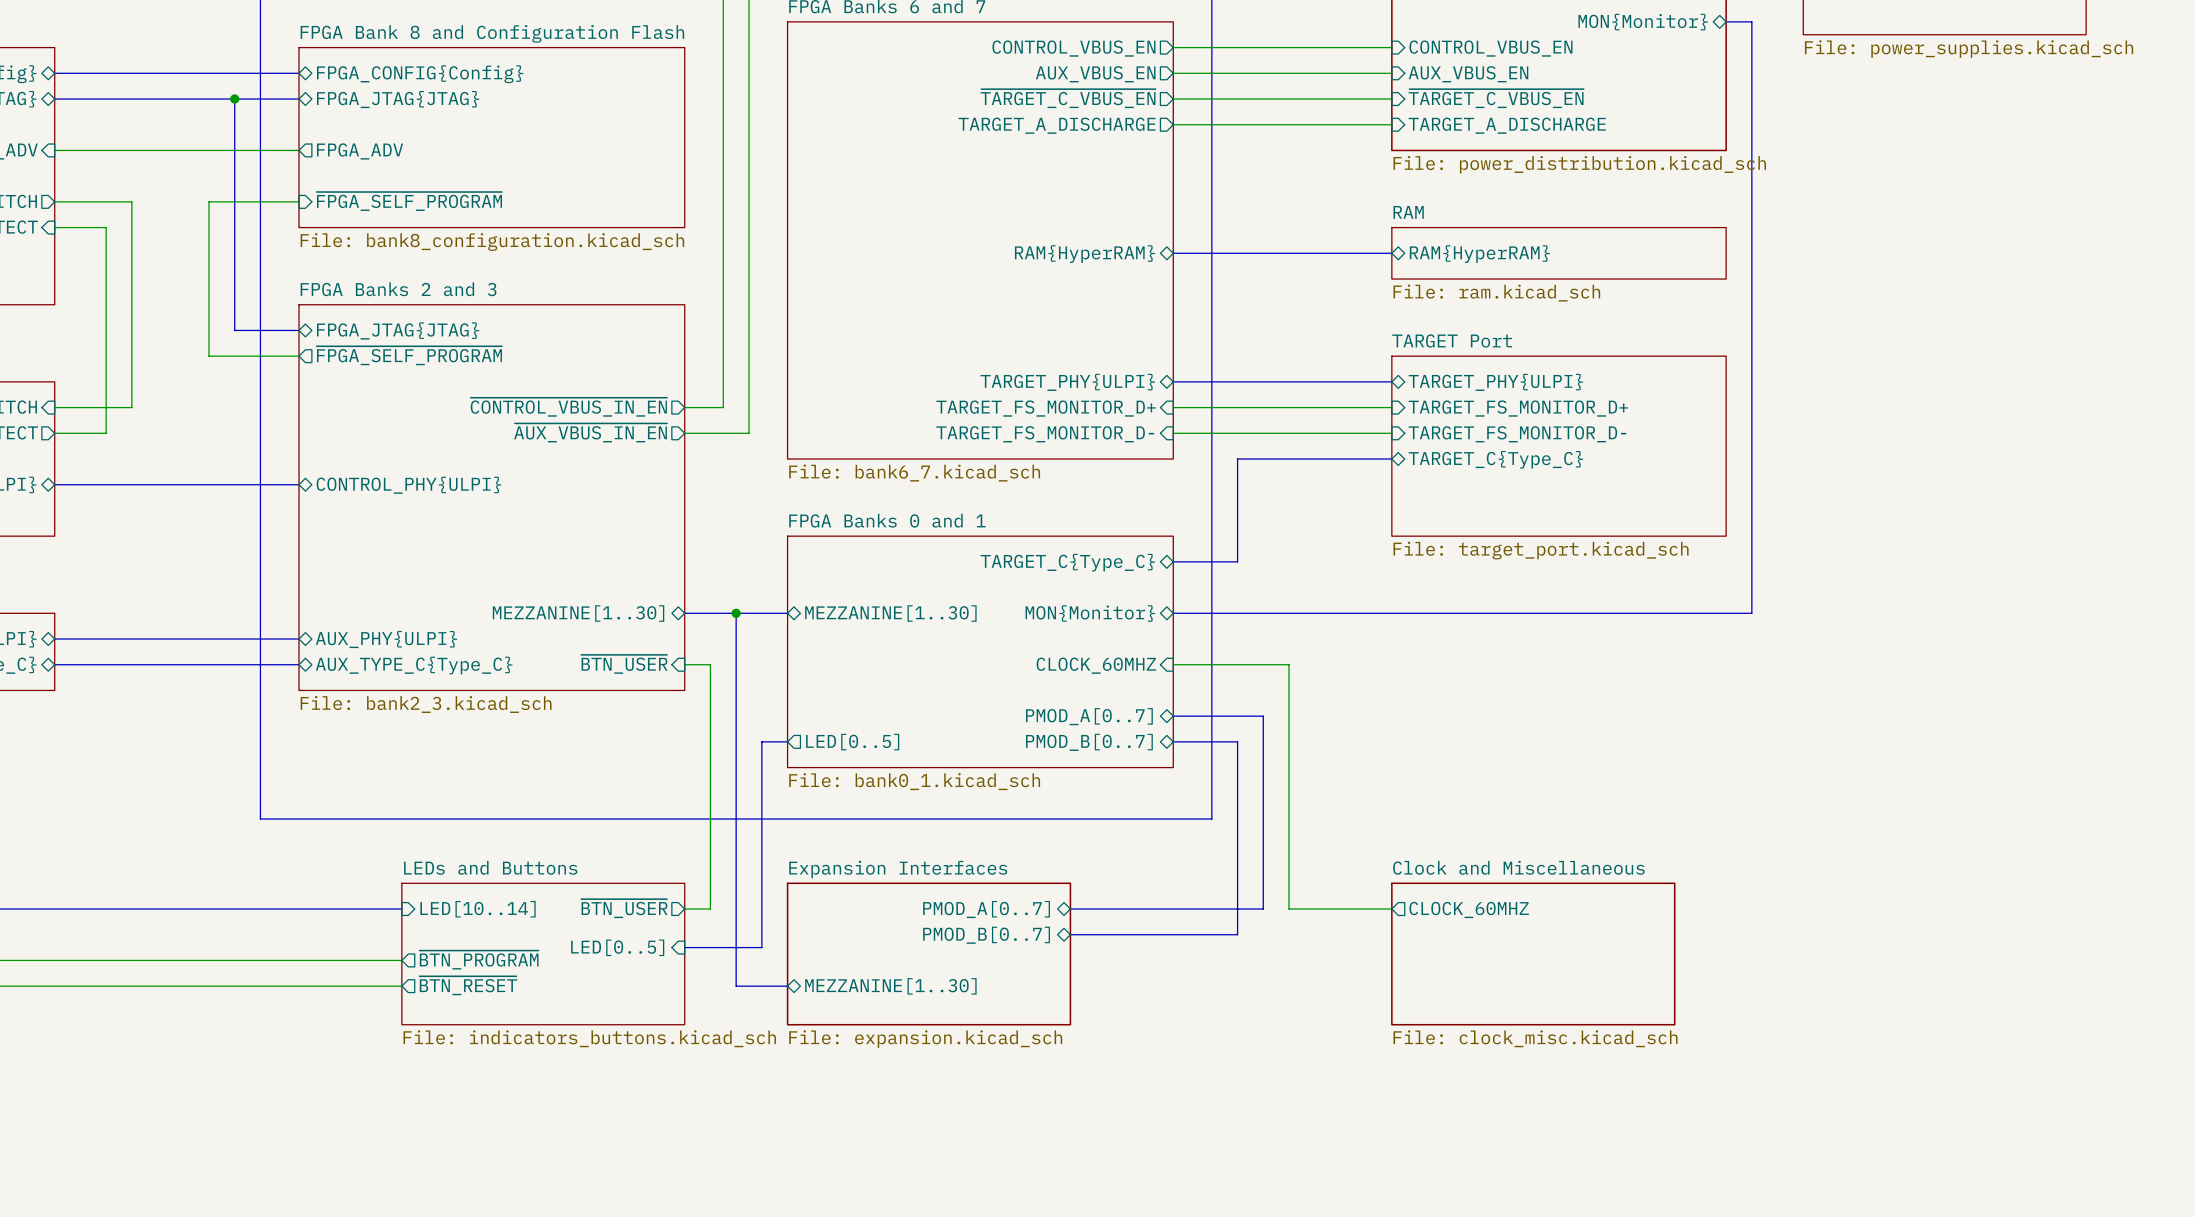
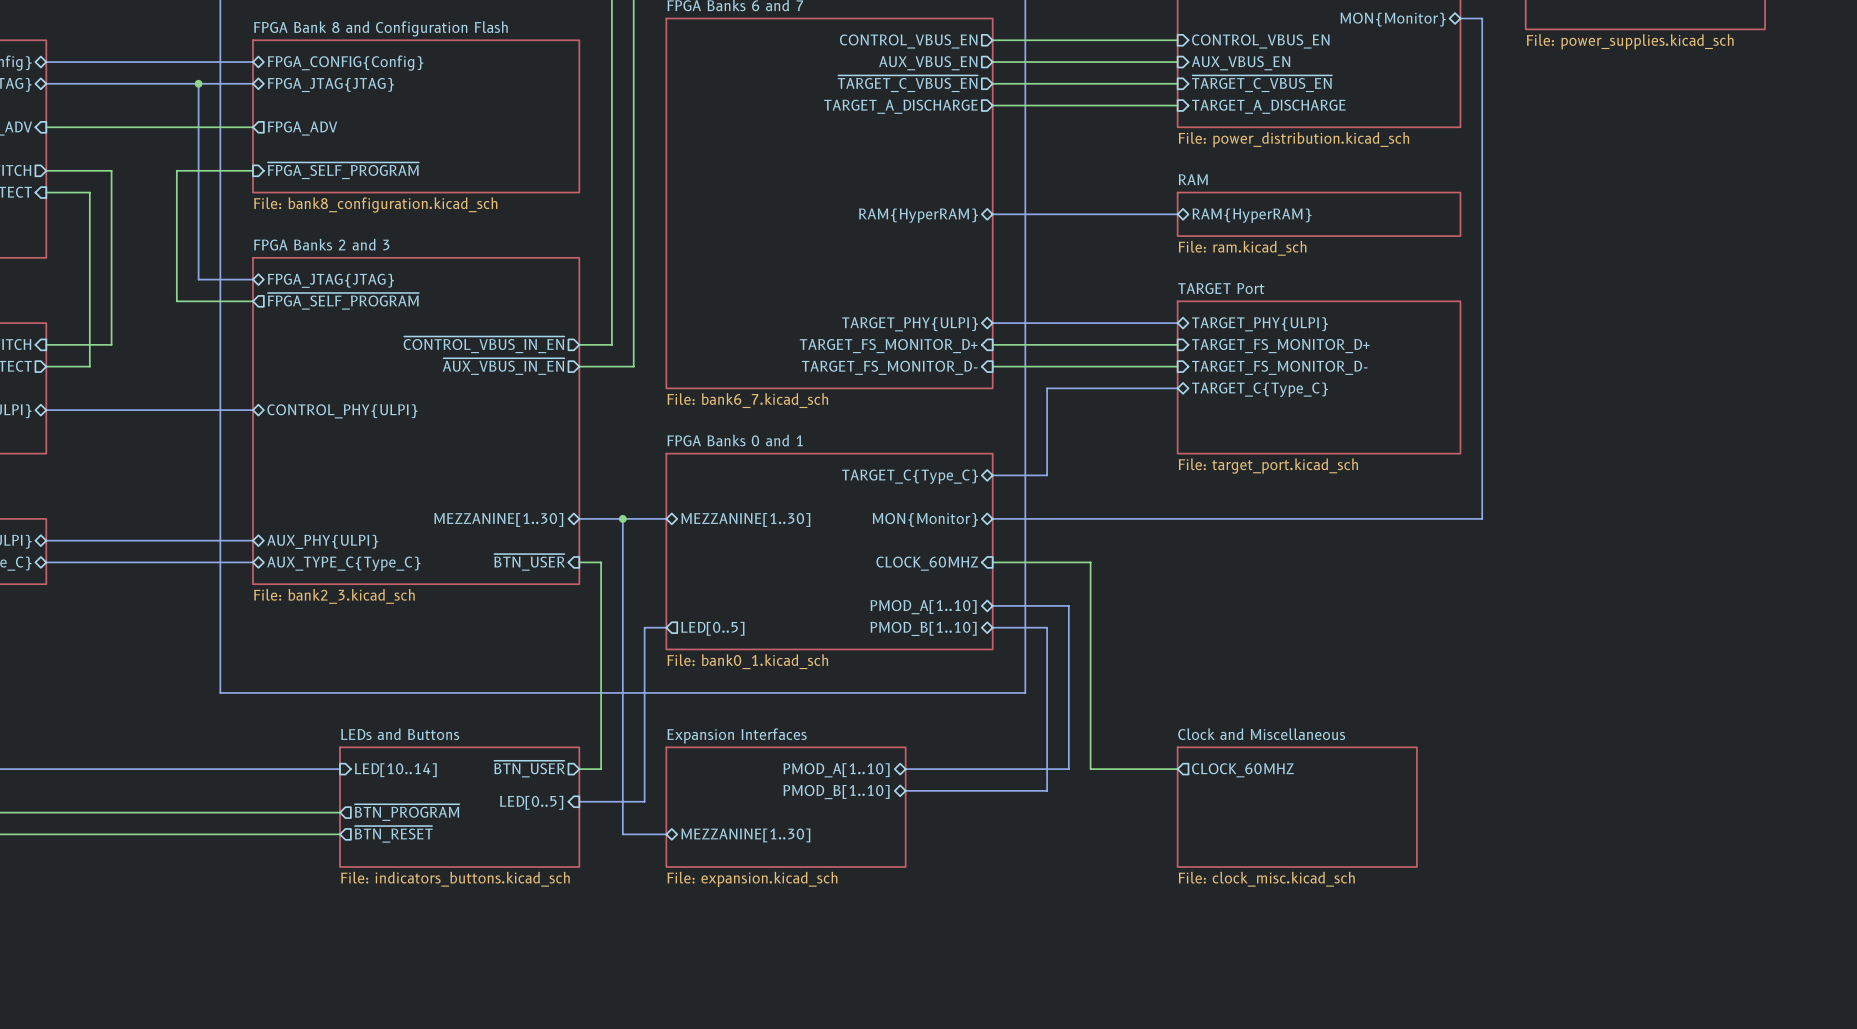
sheet pin: PMOD_A[0..7] (1089, 716) -> PMOD_A[1..10] (923, 607)
sheet pin: PMOD_B[0..7] (1089, 742) -> PMOD_B[1..10] (923, 628)
sheet pin: PMOD_A[0..7] (986, 909) -> PMOD_A[1..10] (836, 770)
sheet pin: PMOD_B[0..7] (986, 935) -> PMOD_B[1..10] (836, 792)

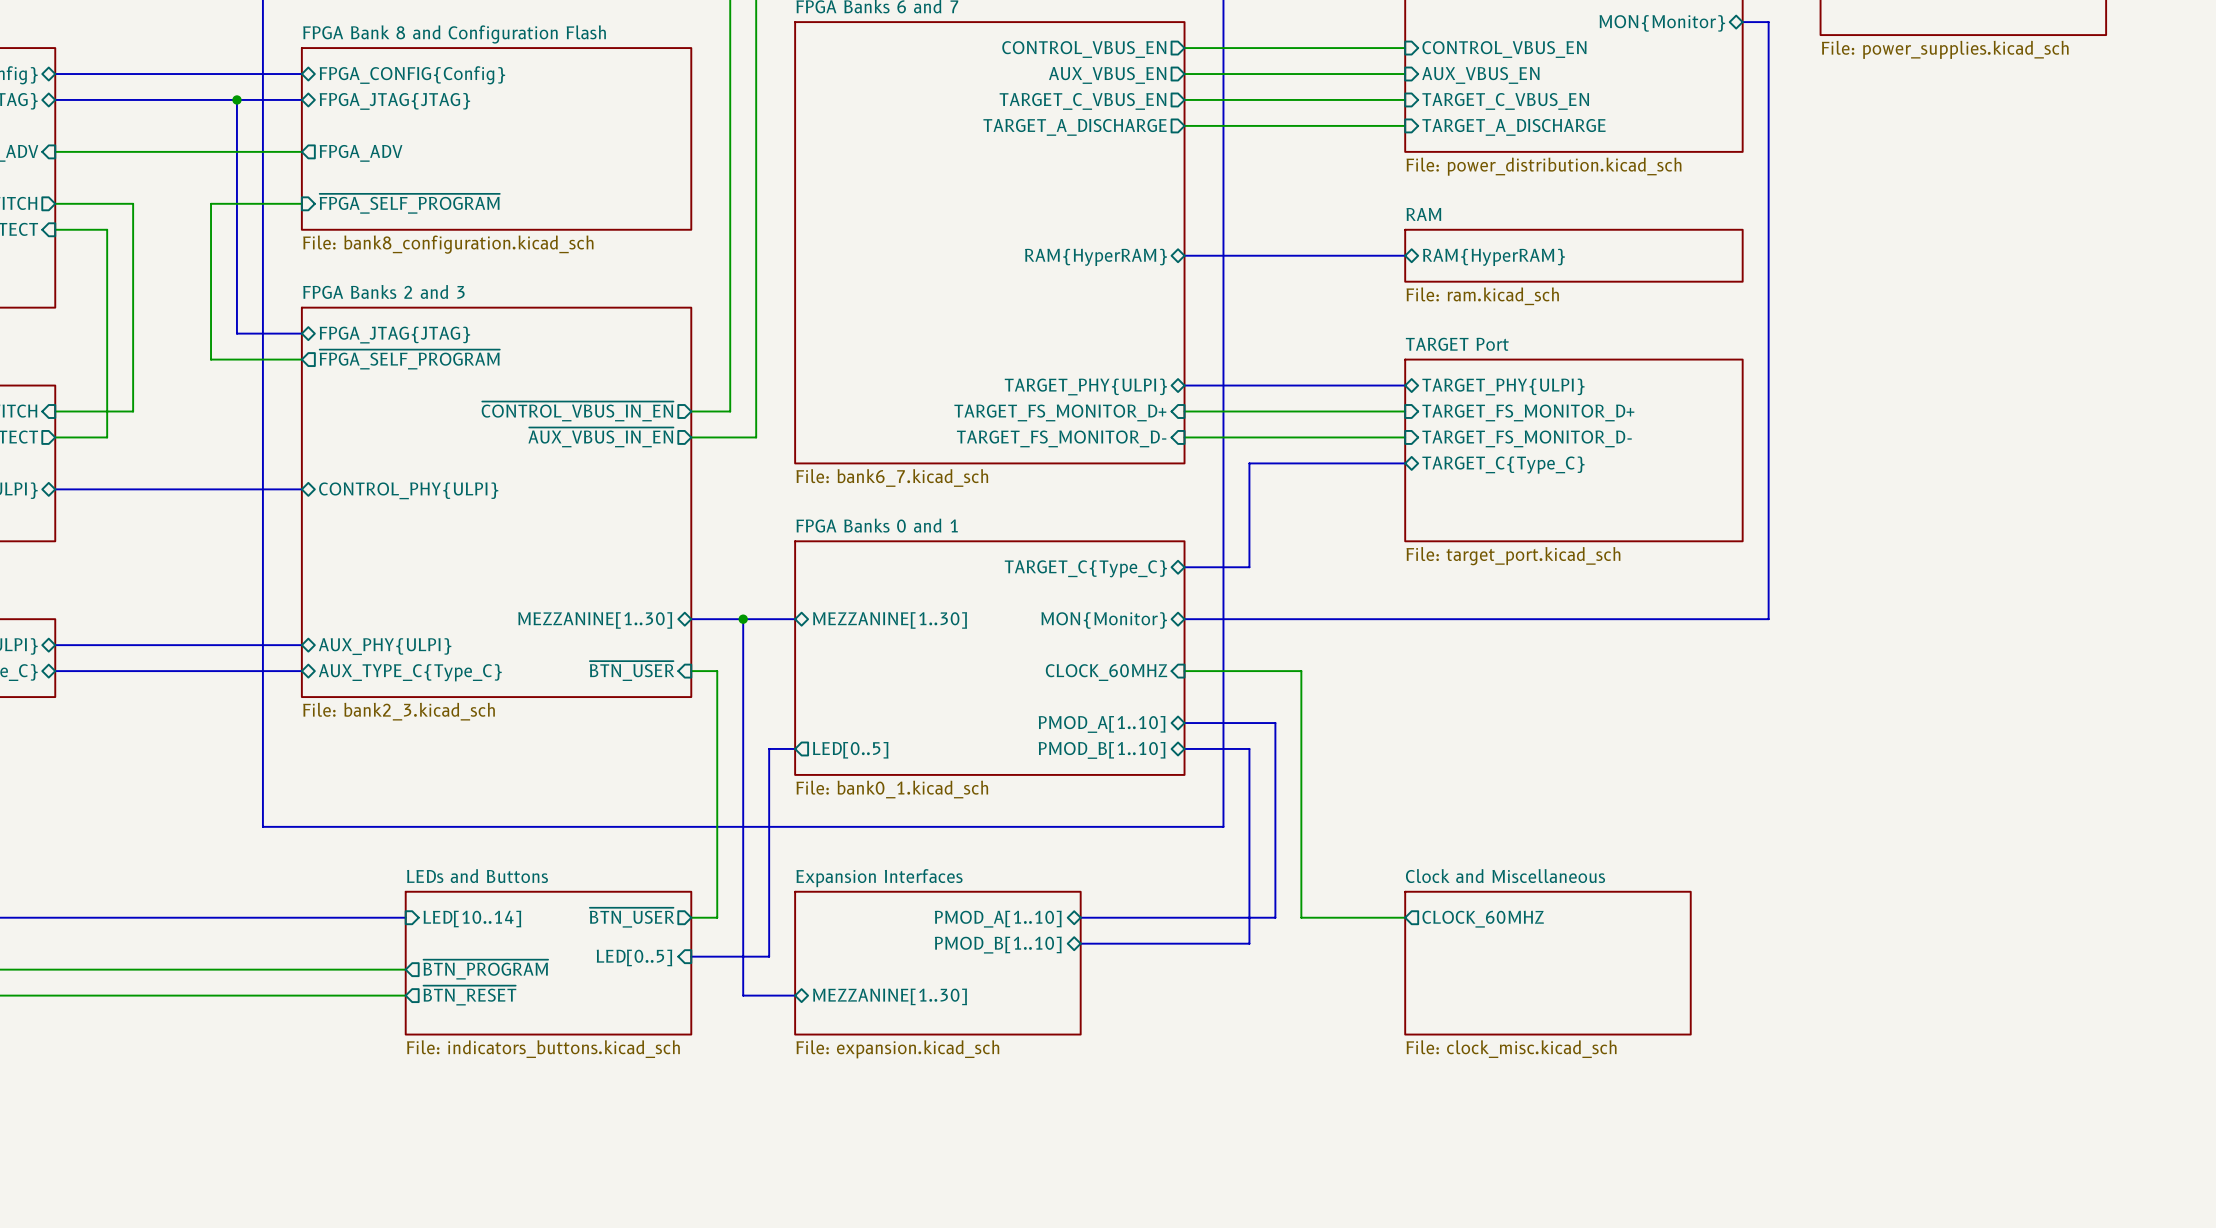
sheet pin: ~{TARGET_C_VBUS_EN} (907, 83) -> TARGET_C_VBUS_EN (1082, 101)
sheet pin: ~{TARGET_C_VBUS_EN} (1262, 83) -> TARGET_C_VBUS_EN (1505, 101)

